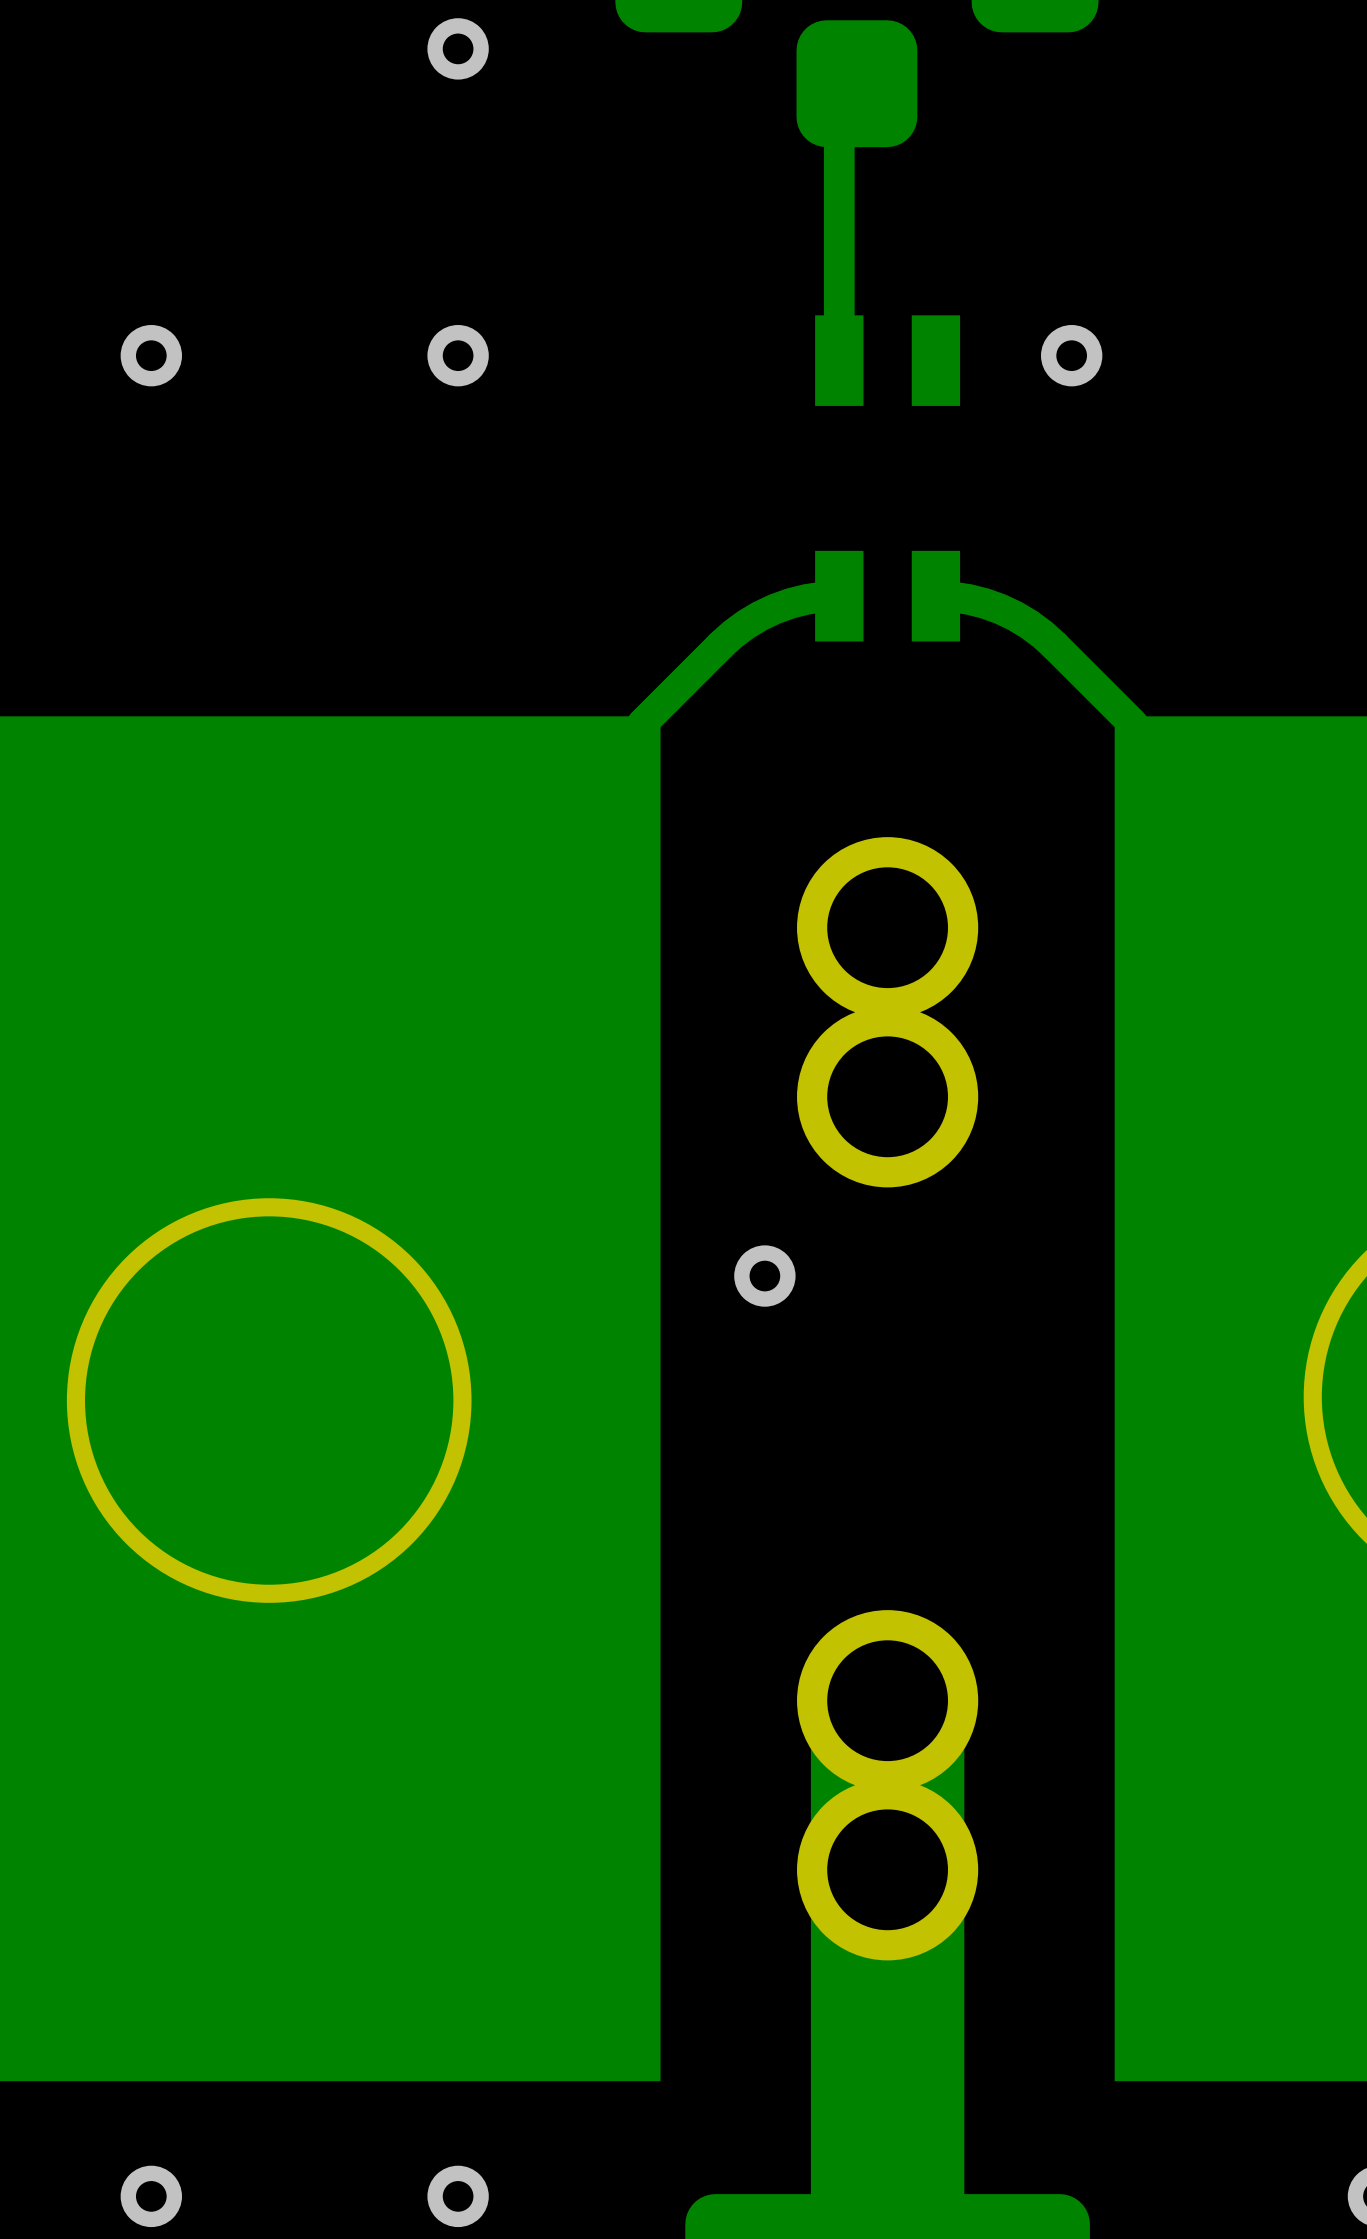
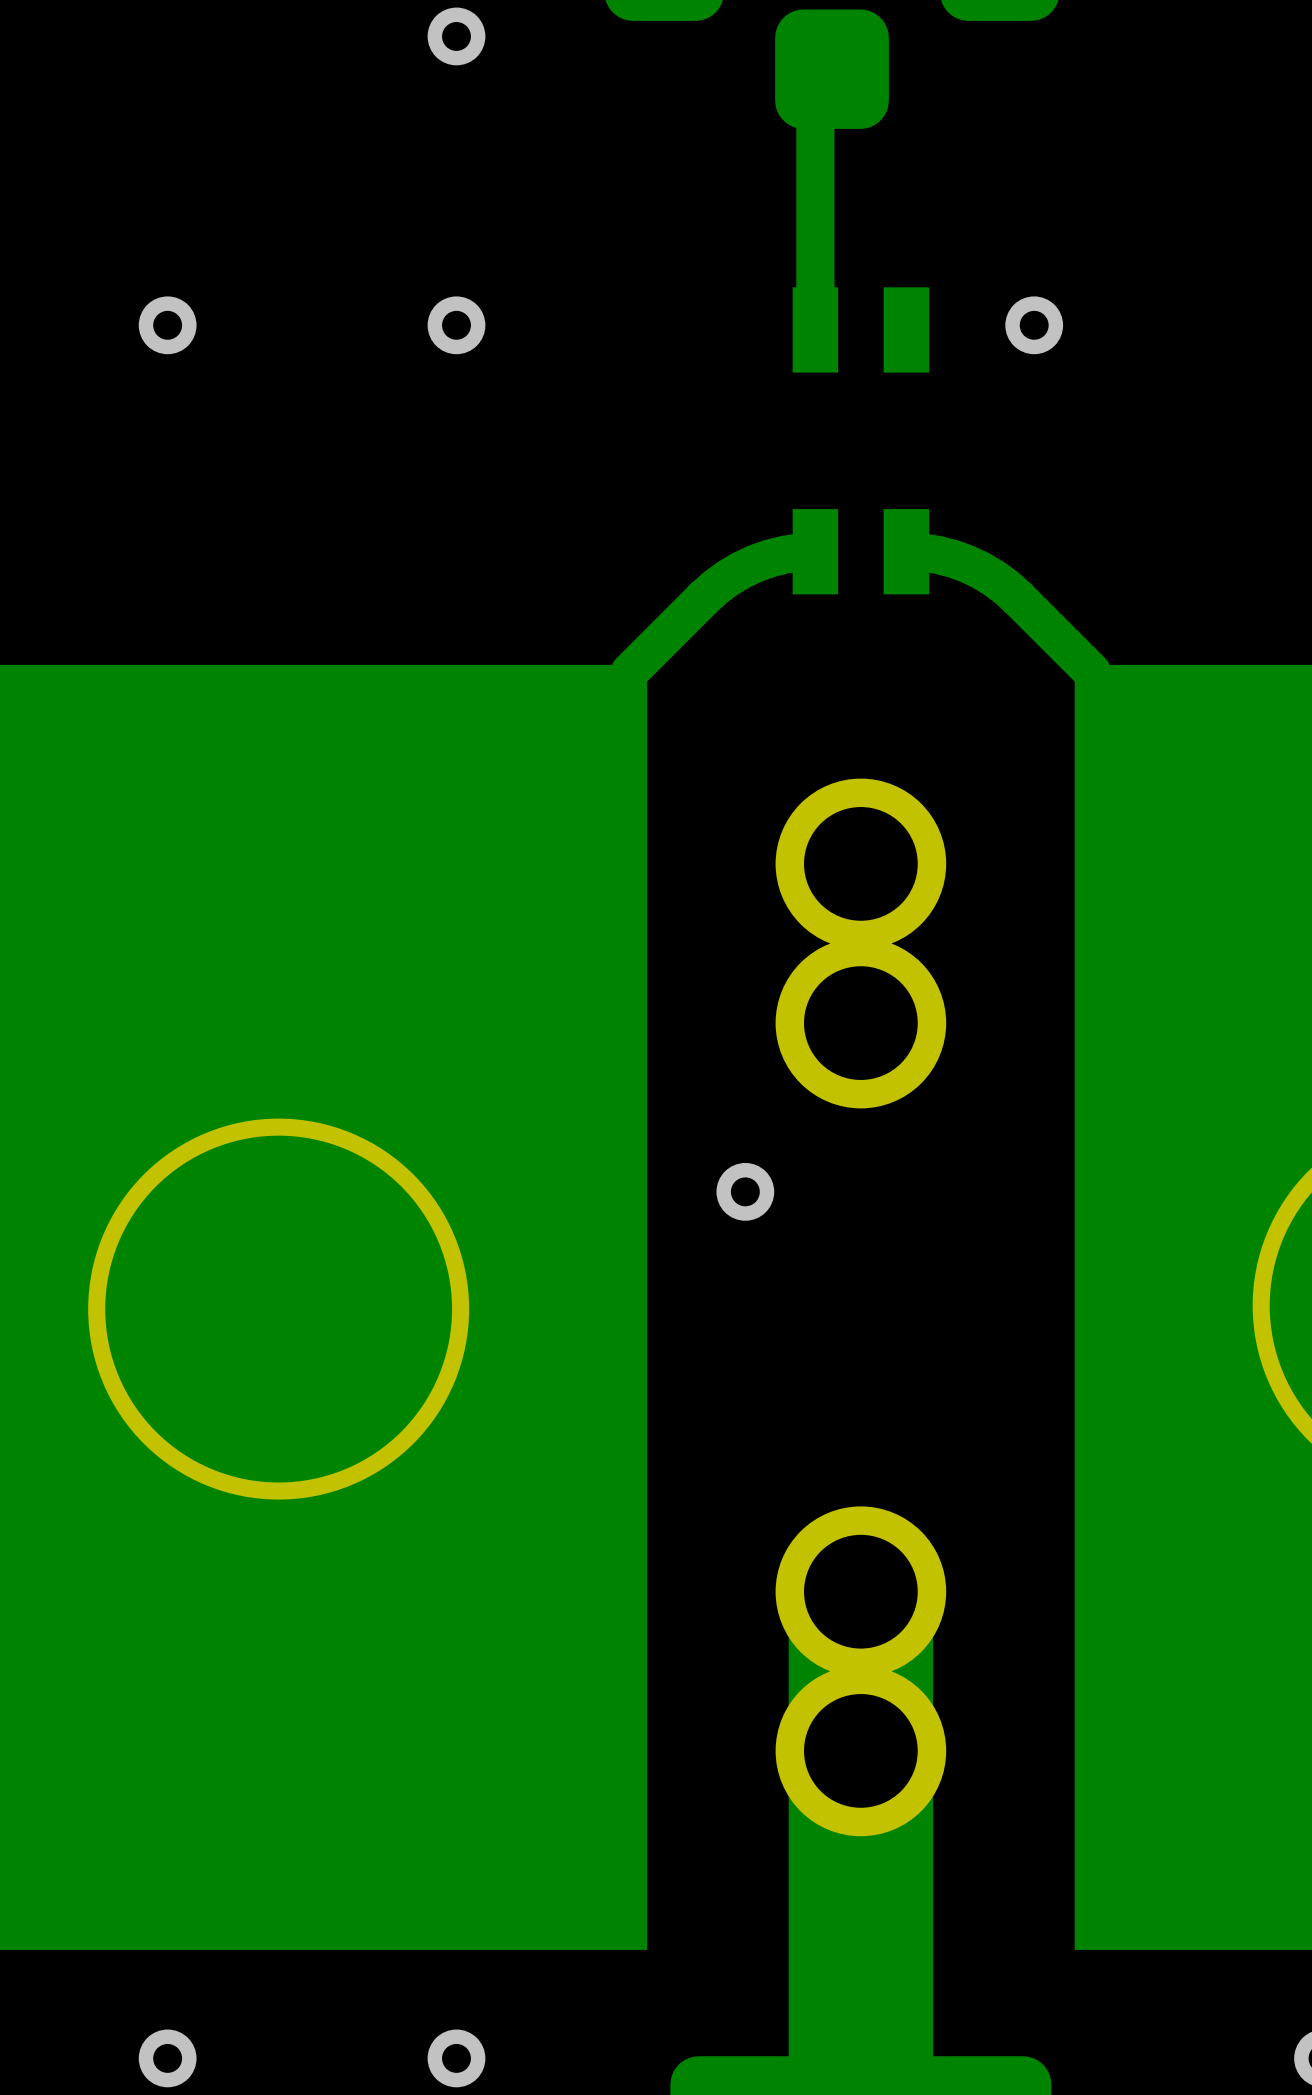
bottom track width: thin (839, 122) (839, 360) -> thick (815, 105) (815, 329)
bottom track width: thin (839, 596) (822, 596) (790, 603) (775, 608) (746, 624) (720, 645) (642, 723) -> thick (815, 551) (799, 552) (769, 558) (754, 563) (727, 578) (703, 597) (629, 671)
bottom track width: thin (935, 596) (968, 599) (984, 603) (1000, 608) (1029, 624) (1054, 645) (1133, 723) -> thick (906, 551) (937, 554) (952, 558) (966, 563) (994, 578) (1018, 597) (1091, 671)

